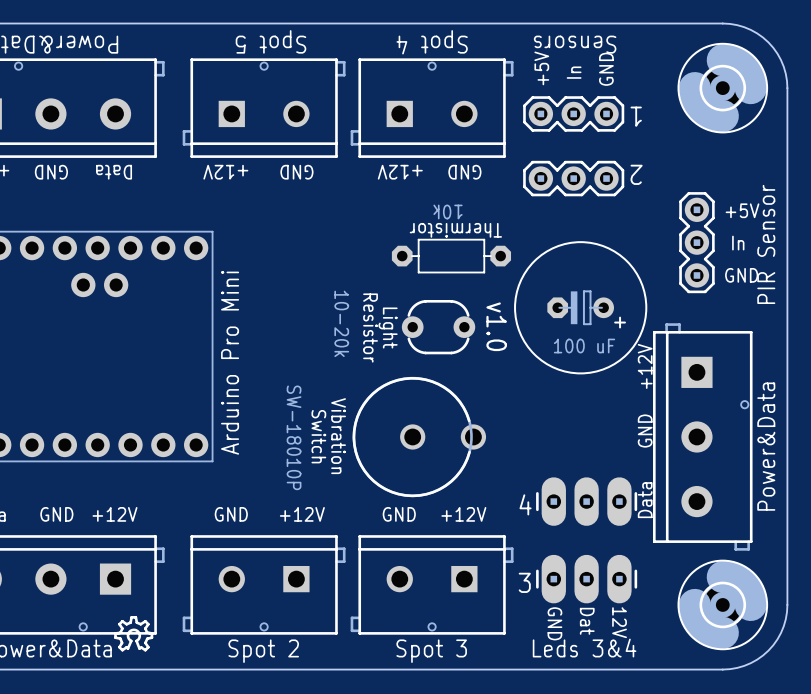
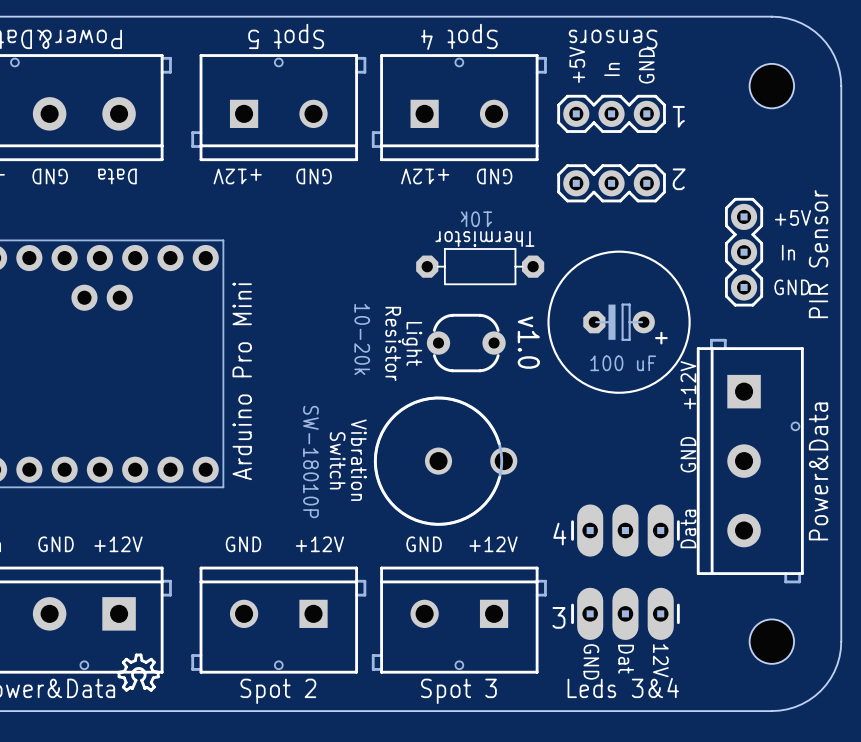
part: (722, 88) -> none
hole: none -> (771, 86)
part: (722, 604) -> none
hole: none -> (771, 641)

